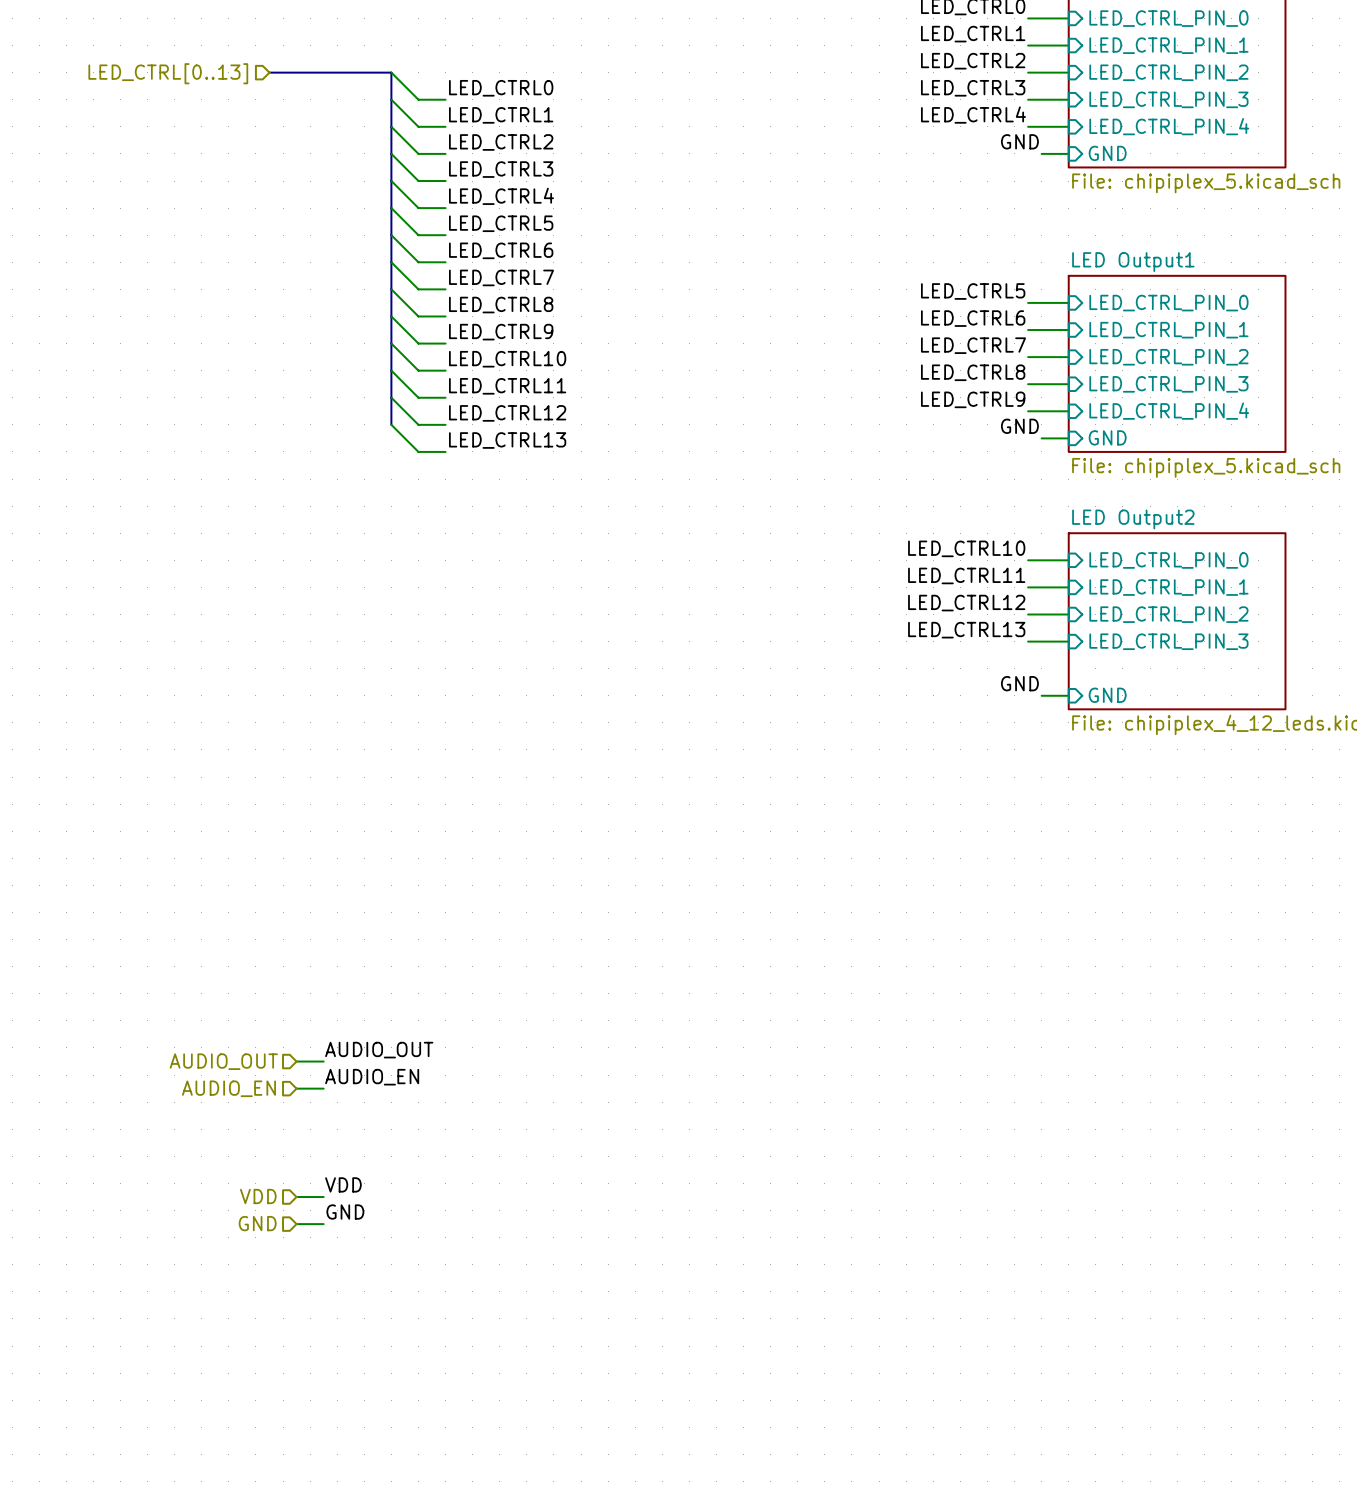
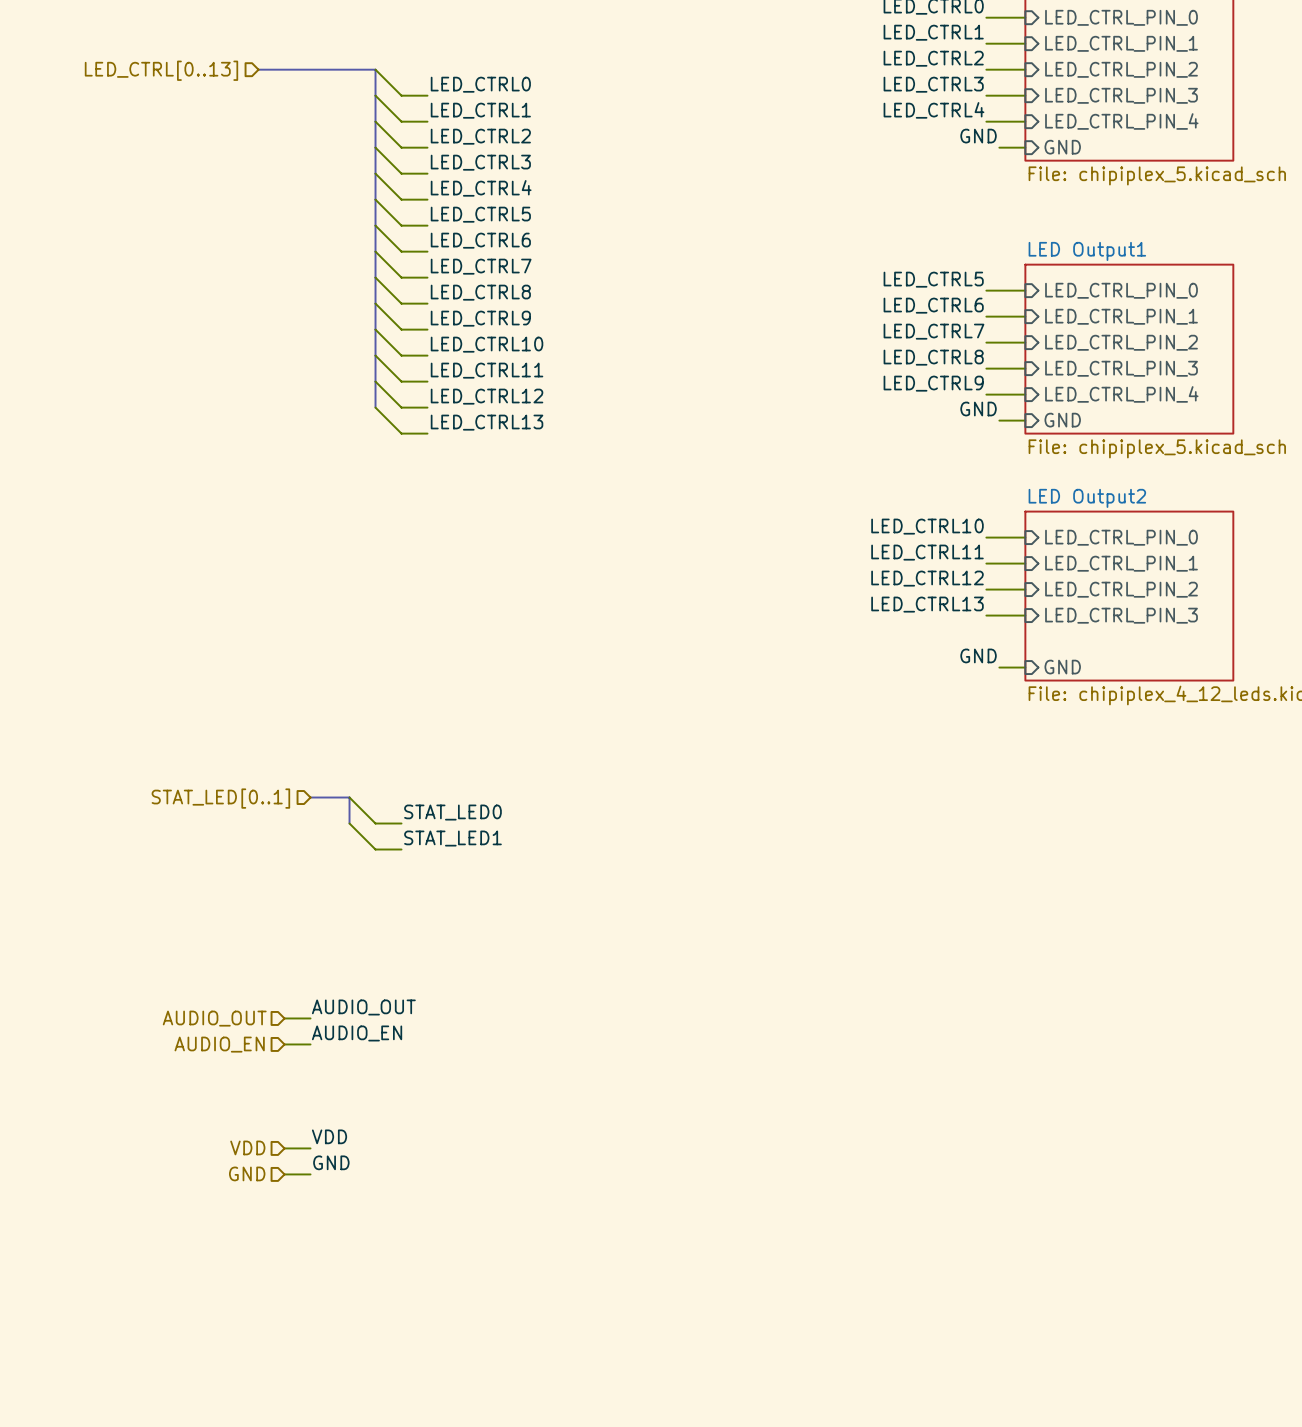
bus: none -> (310, 797) (349, 797) (349, 823)
wire: none -> (349, 797) (375, 823) (401, 823)
hierarchical label: none -> STAT_LED[0..1] (220, 798)
label: none -> STAT_LED0 (452, 812)
wire: none -> (349, 823) (375, 849) (401, 849)
label: none -> STAT_LED1 (452, 838)

